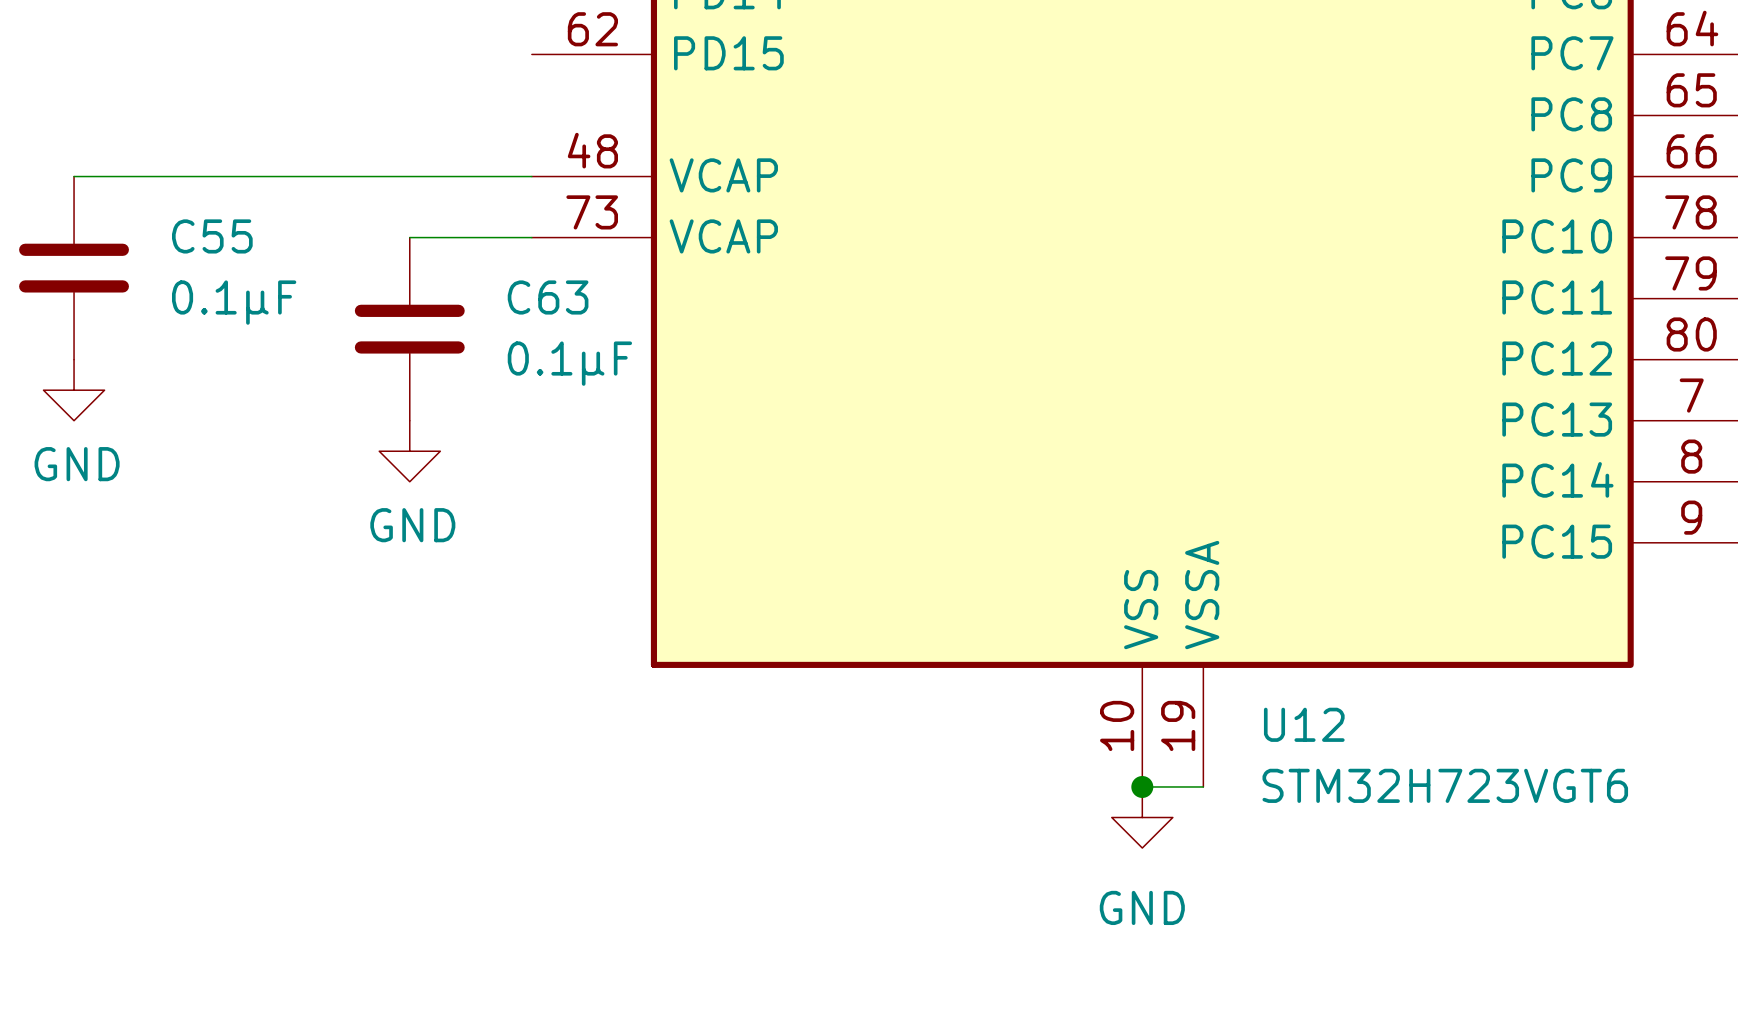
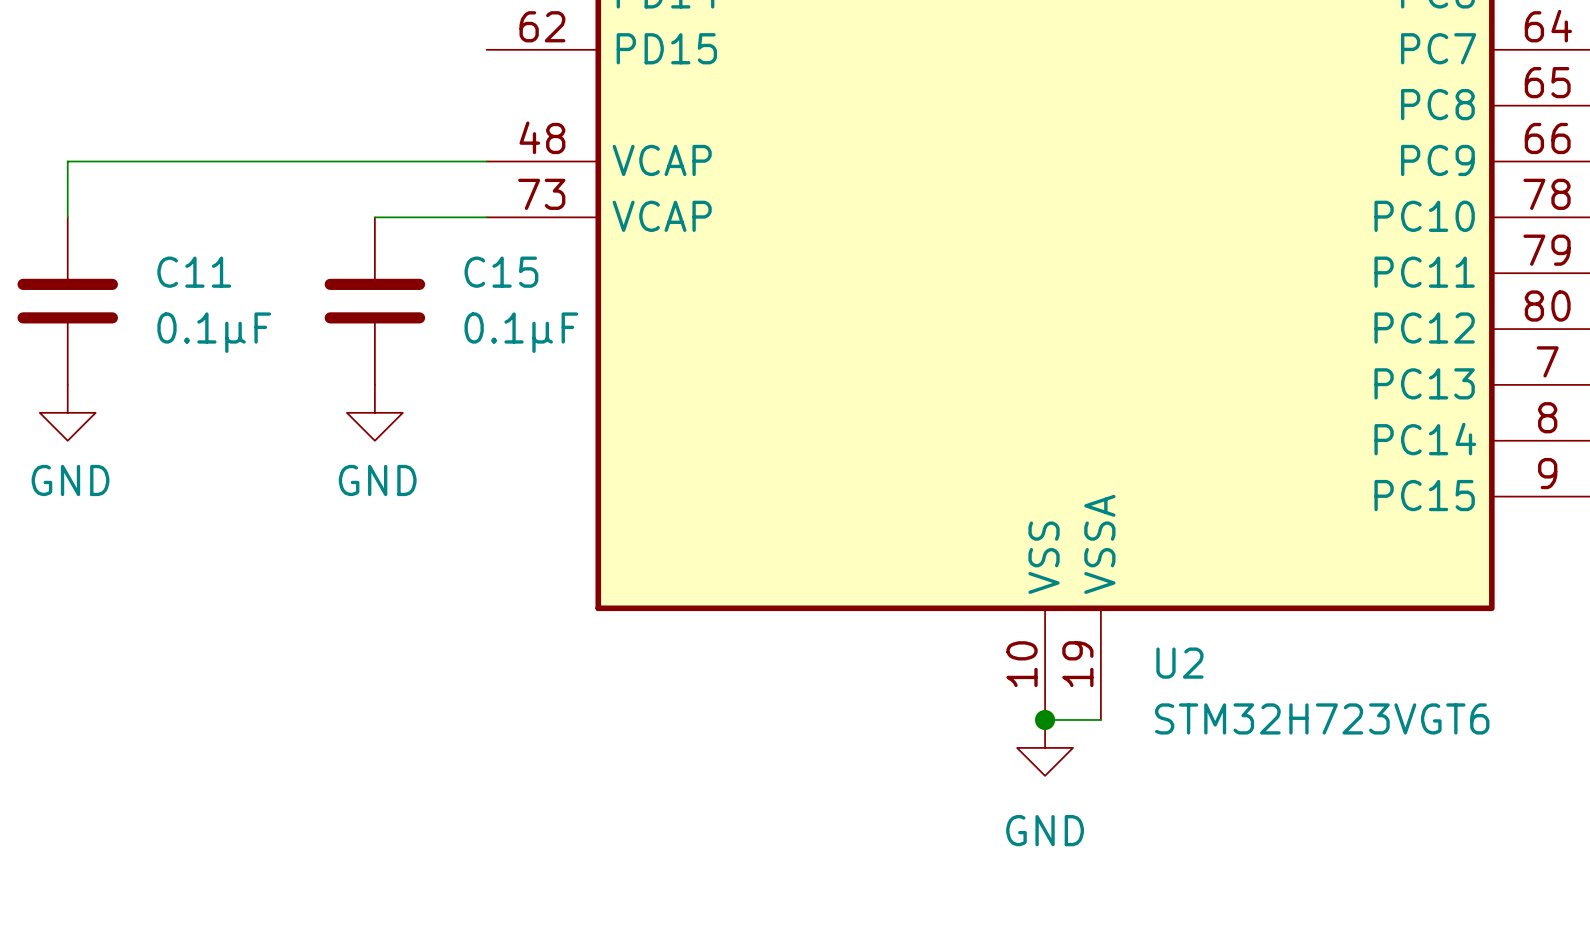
C55: 0.1μF (74, 268) -> none
C63 name: C63 (548, 297) -> C15 (501, 272)
C11: none -> 0.1μF (67, 301)
power symbol position: GND (74, 390) -> GND (67, 412)
U12 name: U12 (1304, 724) -> U2 (1179, 663)

